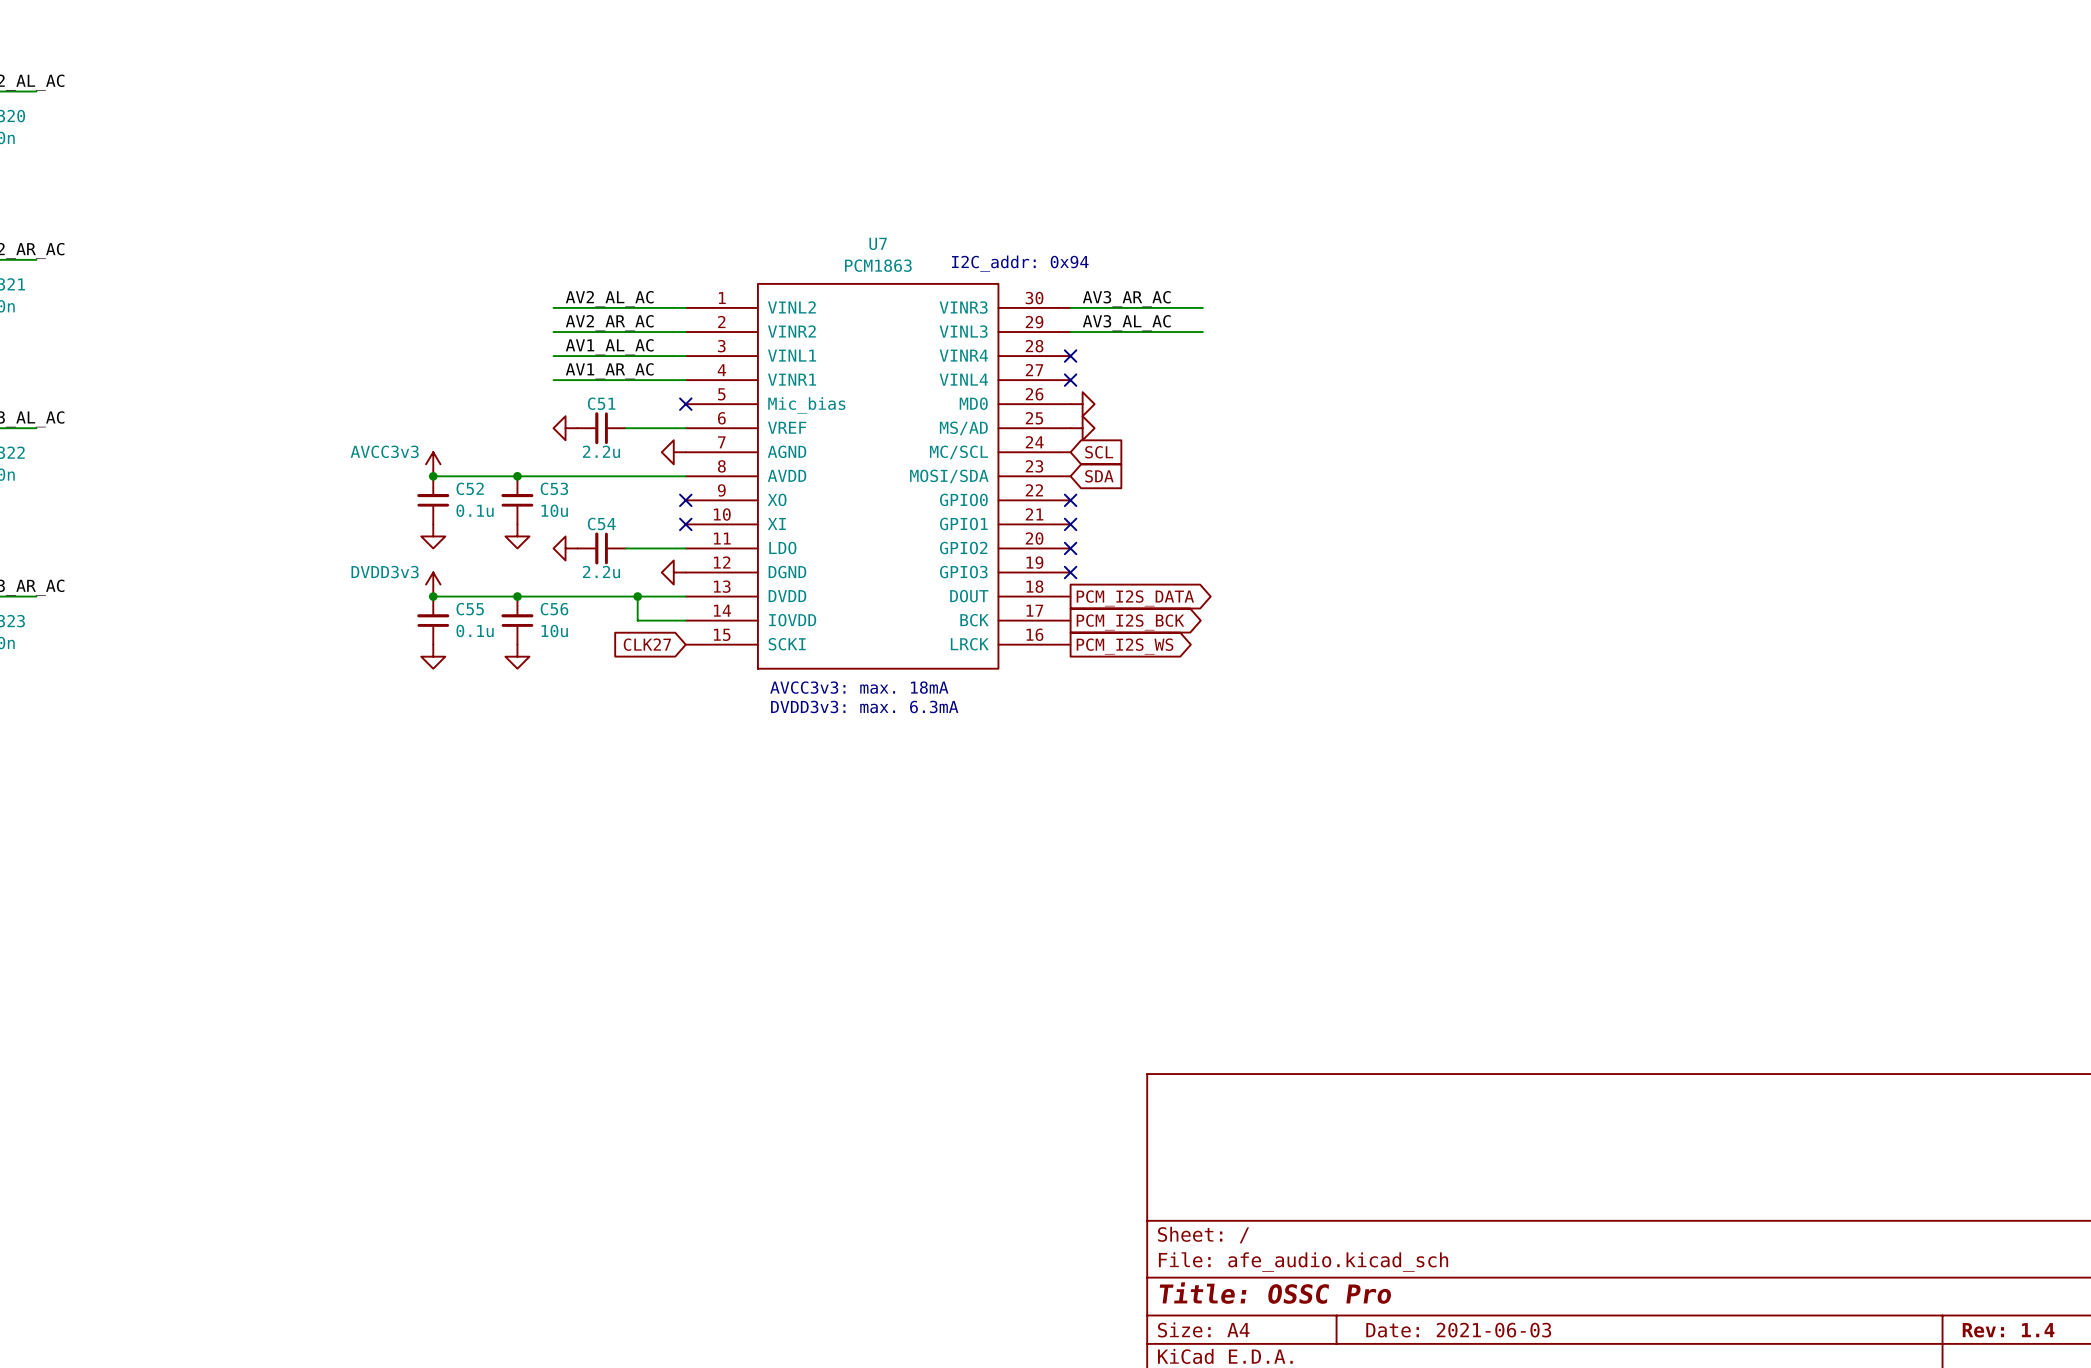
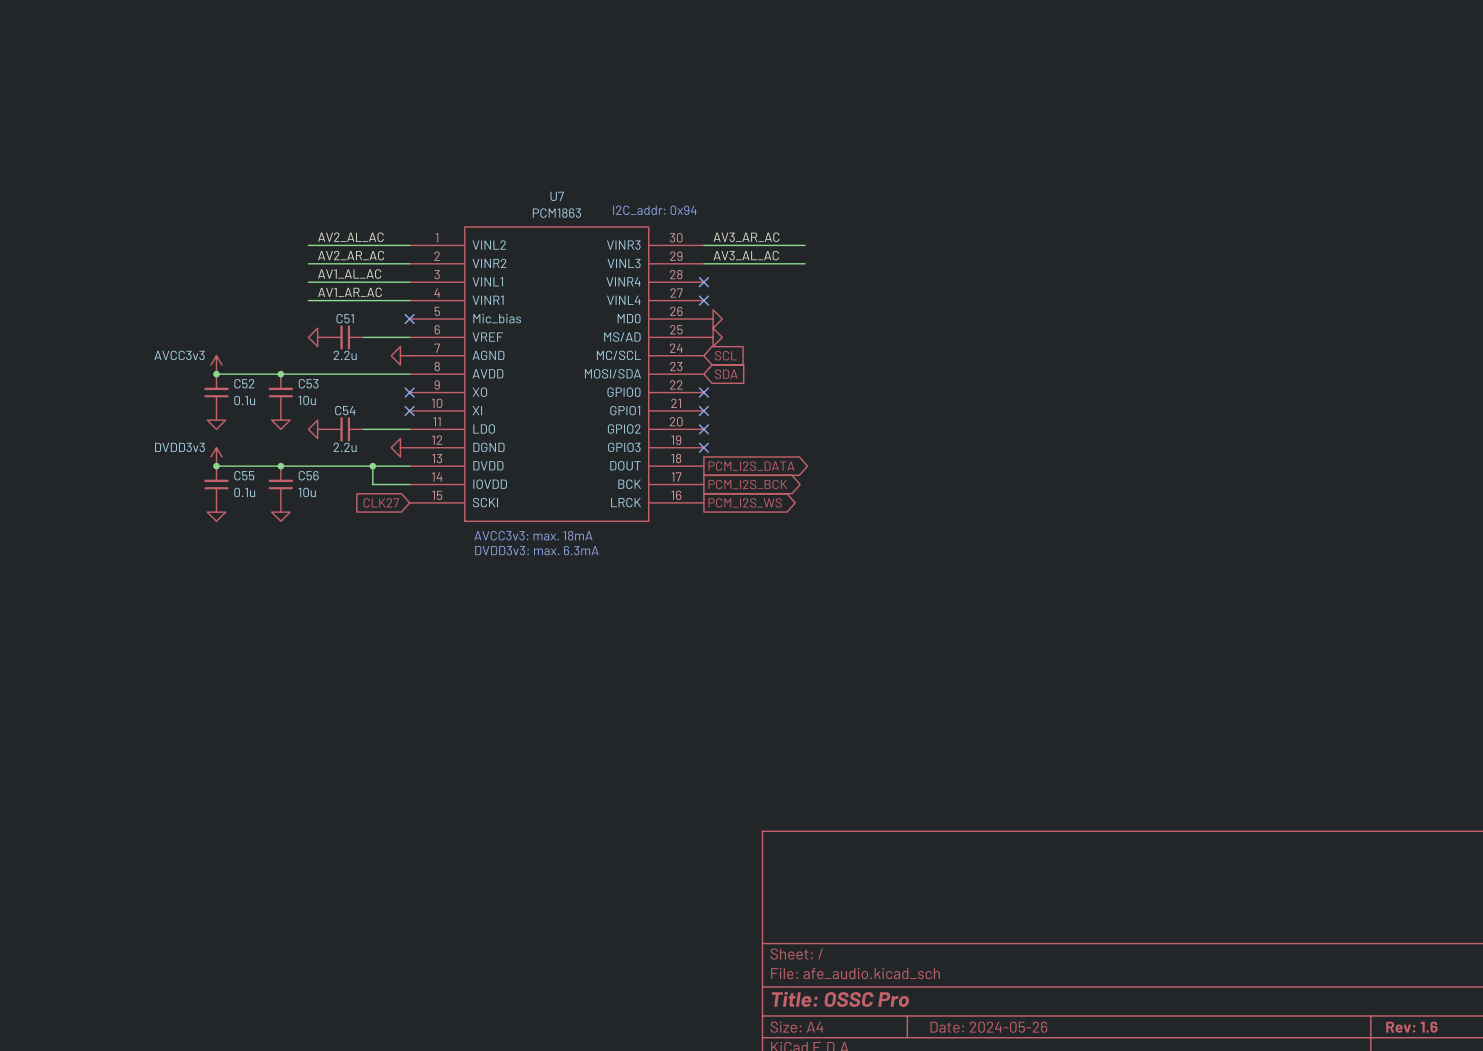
title block: Date: 2021-06-03 (1458, 1330) -> Date: 2024-05-26 (988, 1027)
title block: Rev: 1.4 (2008, 1330) -> Rev: 1.6 (1411, 1027)

